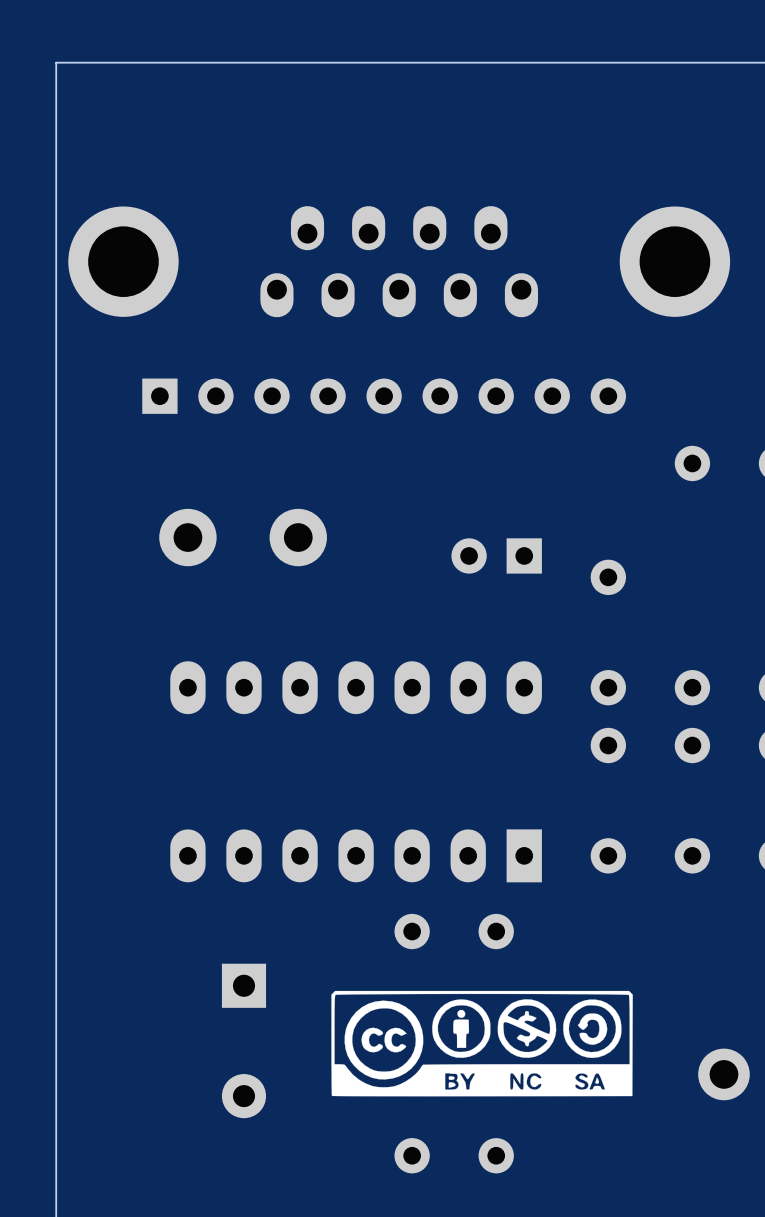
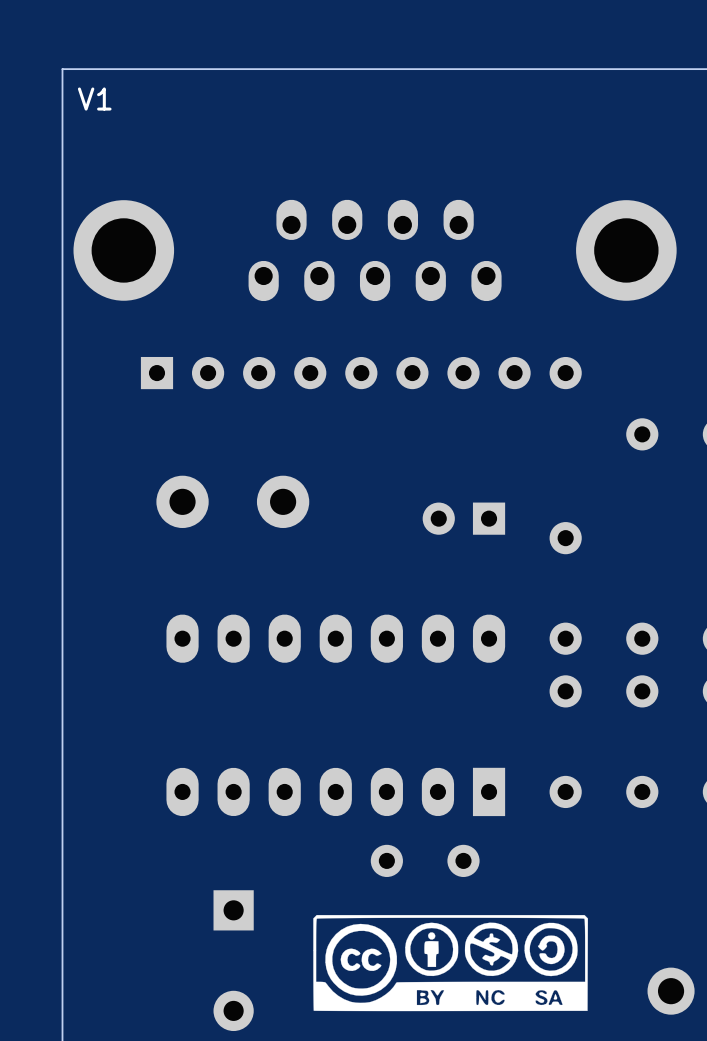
text: none -> V1 (94, 99)

